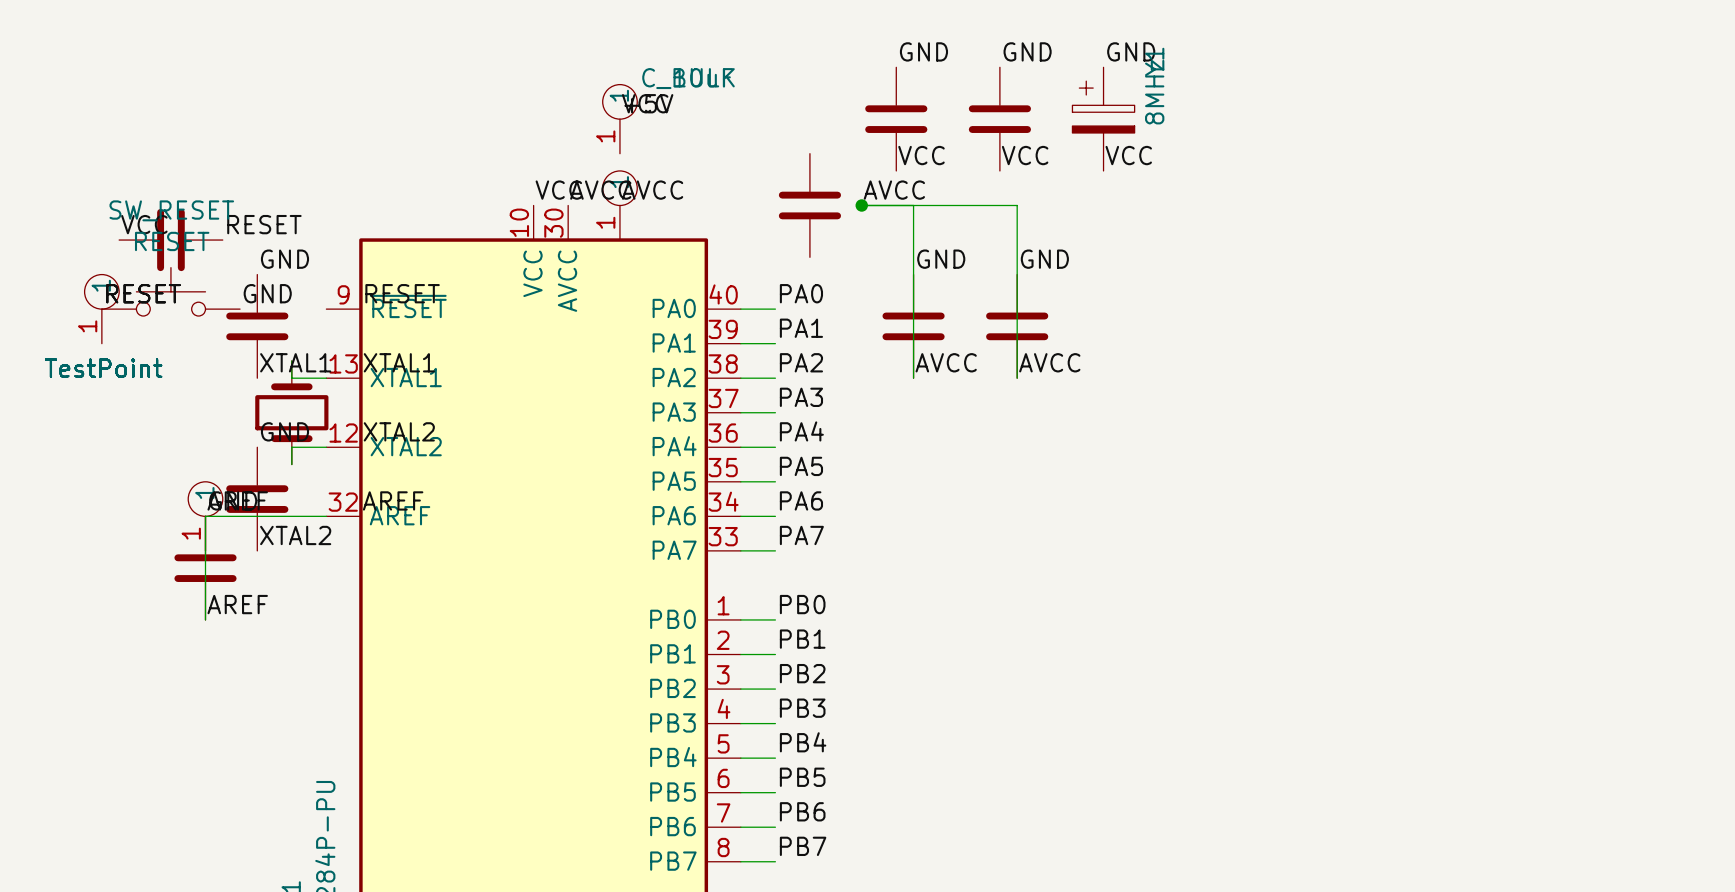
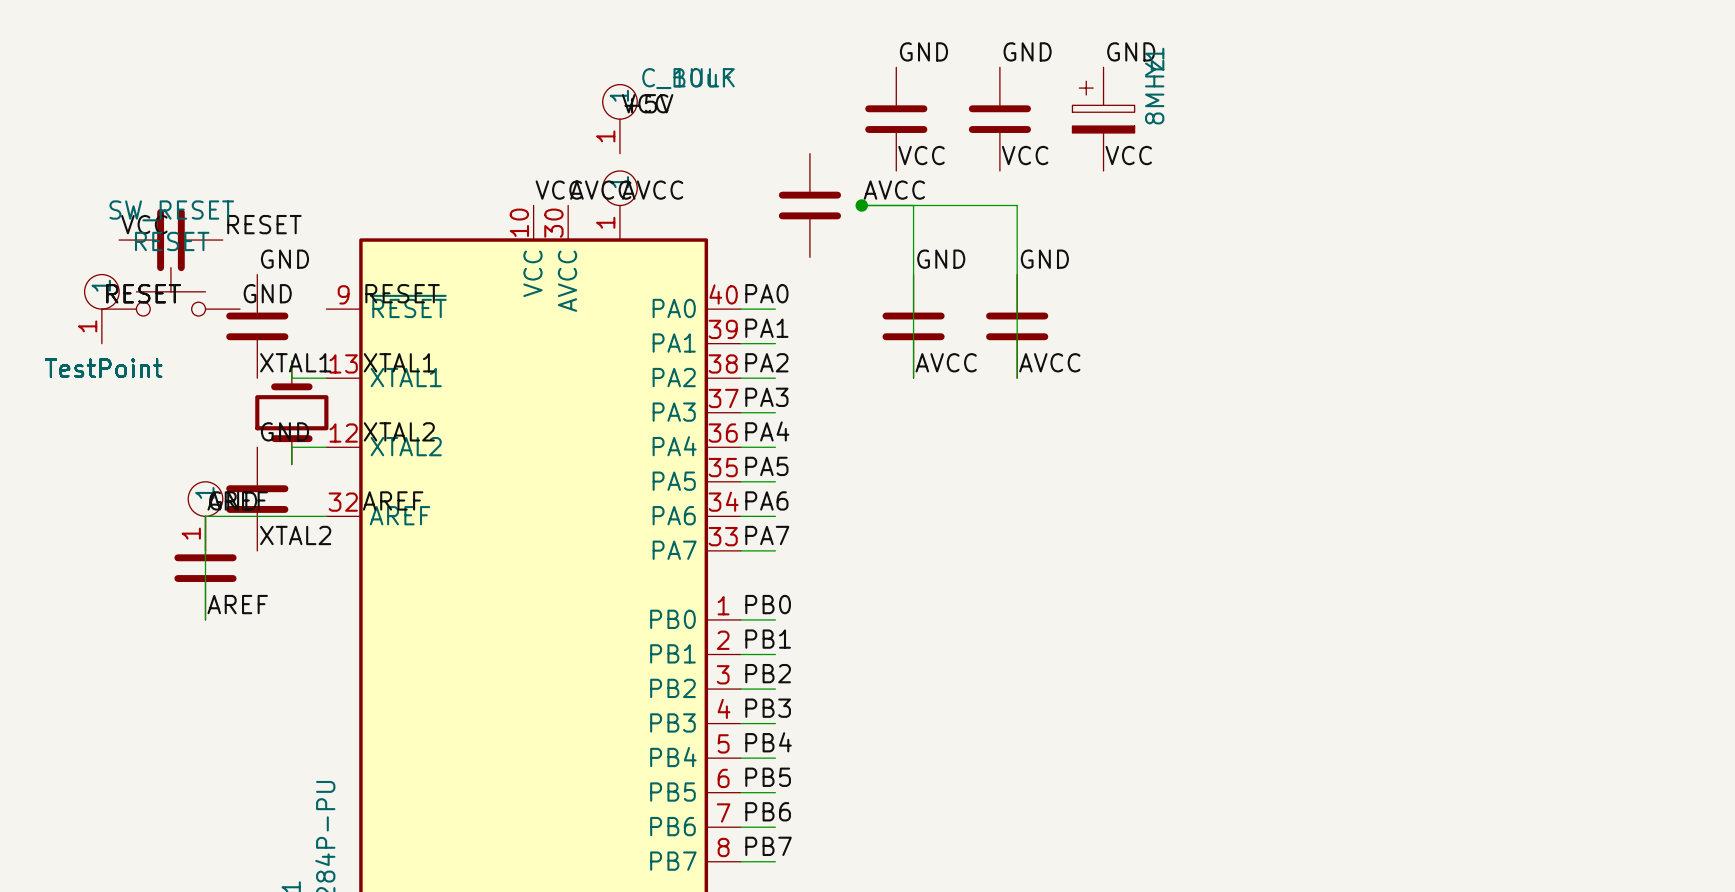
label position: PA0 (801, 293) -> PA0 (766, 293)
label position: PA1 (801, 328) -> PA1 (766, 328)
label position: PA2 (801, 362) -> PA2 (766, 362)
label position: PA3 (801, 397) -> PA3 (766, 397)
label position: PA4 (801, 431) -> PA4 (767, 431)
label position: PA5 (801, 466) -> PA5 (766, 466)
label position: PA6 (801, 500) -> PA6 (766, 500)
label position: PA7 (801, 535) -> PA7 (767, 535)
label position: PB0 (802, 604) -> PB0 (768, 604)
label position: PB1 (802, 639) -> PB1 (768, 639)
label position: PB2 (802, 673) -> PB2 (768, 673)
label position: PB3 (802, 708) -> PB3 (768, 708)
label position: PB4 (803, 742) -> PB4 (768, 742)
label position: PB5 (802, 777) -> PB5 (768, 777)
label position: PB6 (802, 811) -> PB6 (768, 811)
label position: PB7 (803, 846) -> PB7 (768, 846)

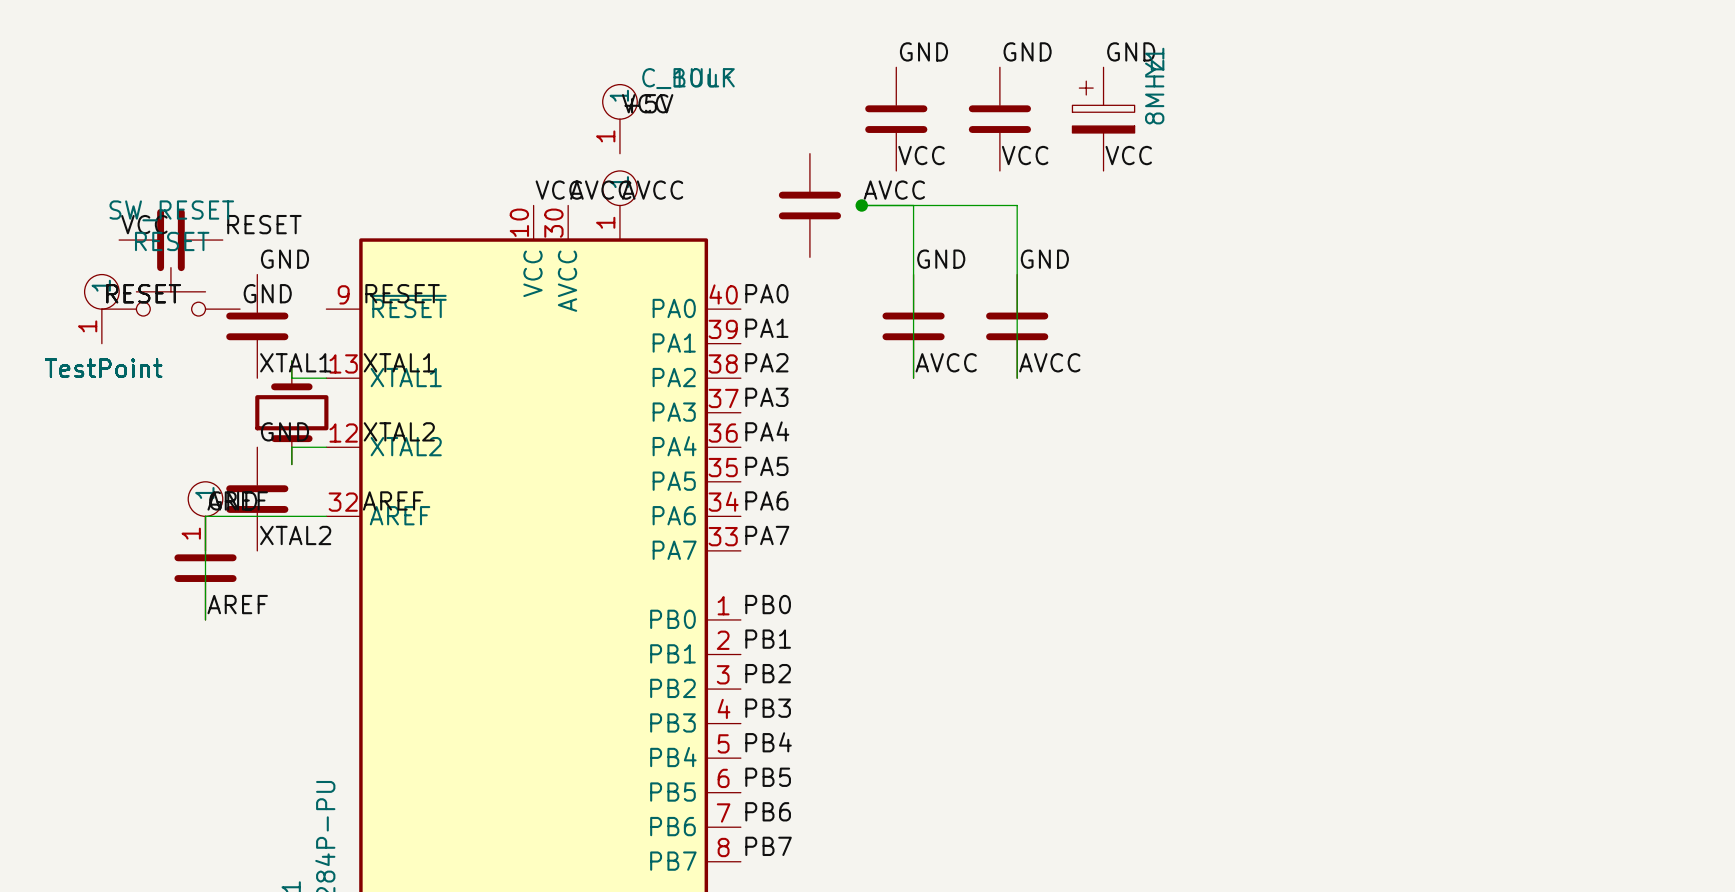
wire: (740, 309) (775, 309) -> none
wire: (740, 343) (775, 343) -> none
wire: (740, 378) (775, 378) -> none
wire: (740, 412) (775, 412) -> none
wire: (740, 447) (775, 447) -> none
wire: (740, 481) (775, 481) -> none
wire: (740, 516) (775, 516) -> none
wire: (740, 550) (775, 550) -> none
wire: (740, 619) (775, 619) -> none
wire: (740, 654) (775, 654) -> none
wire: (740, 689) (775, 689) -> none
wire: (740, 723) (775, 723) -> none
wire: (740, 758) (775, 758) -> none
wire: (740, 792) (775, 792) -> none
wire: (740, 827) (775, 827) -> none
wire: (740, 861) (775, 861) -> none

